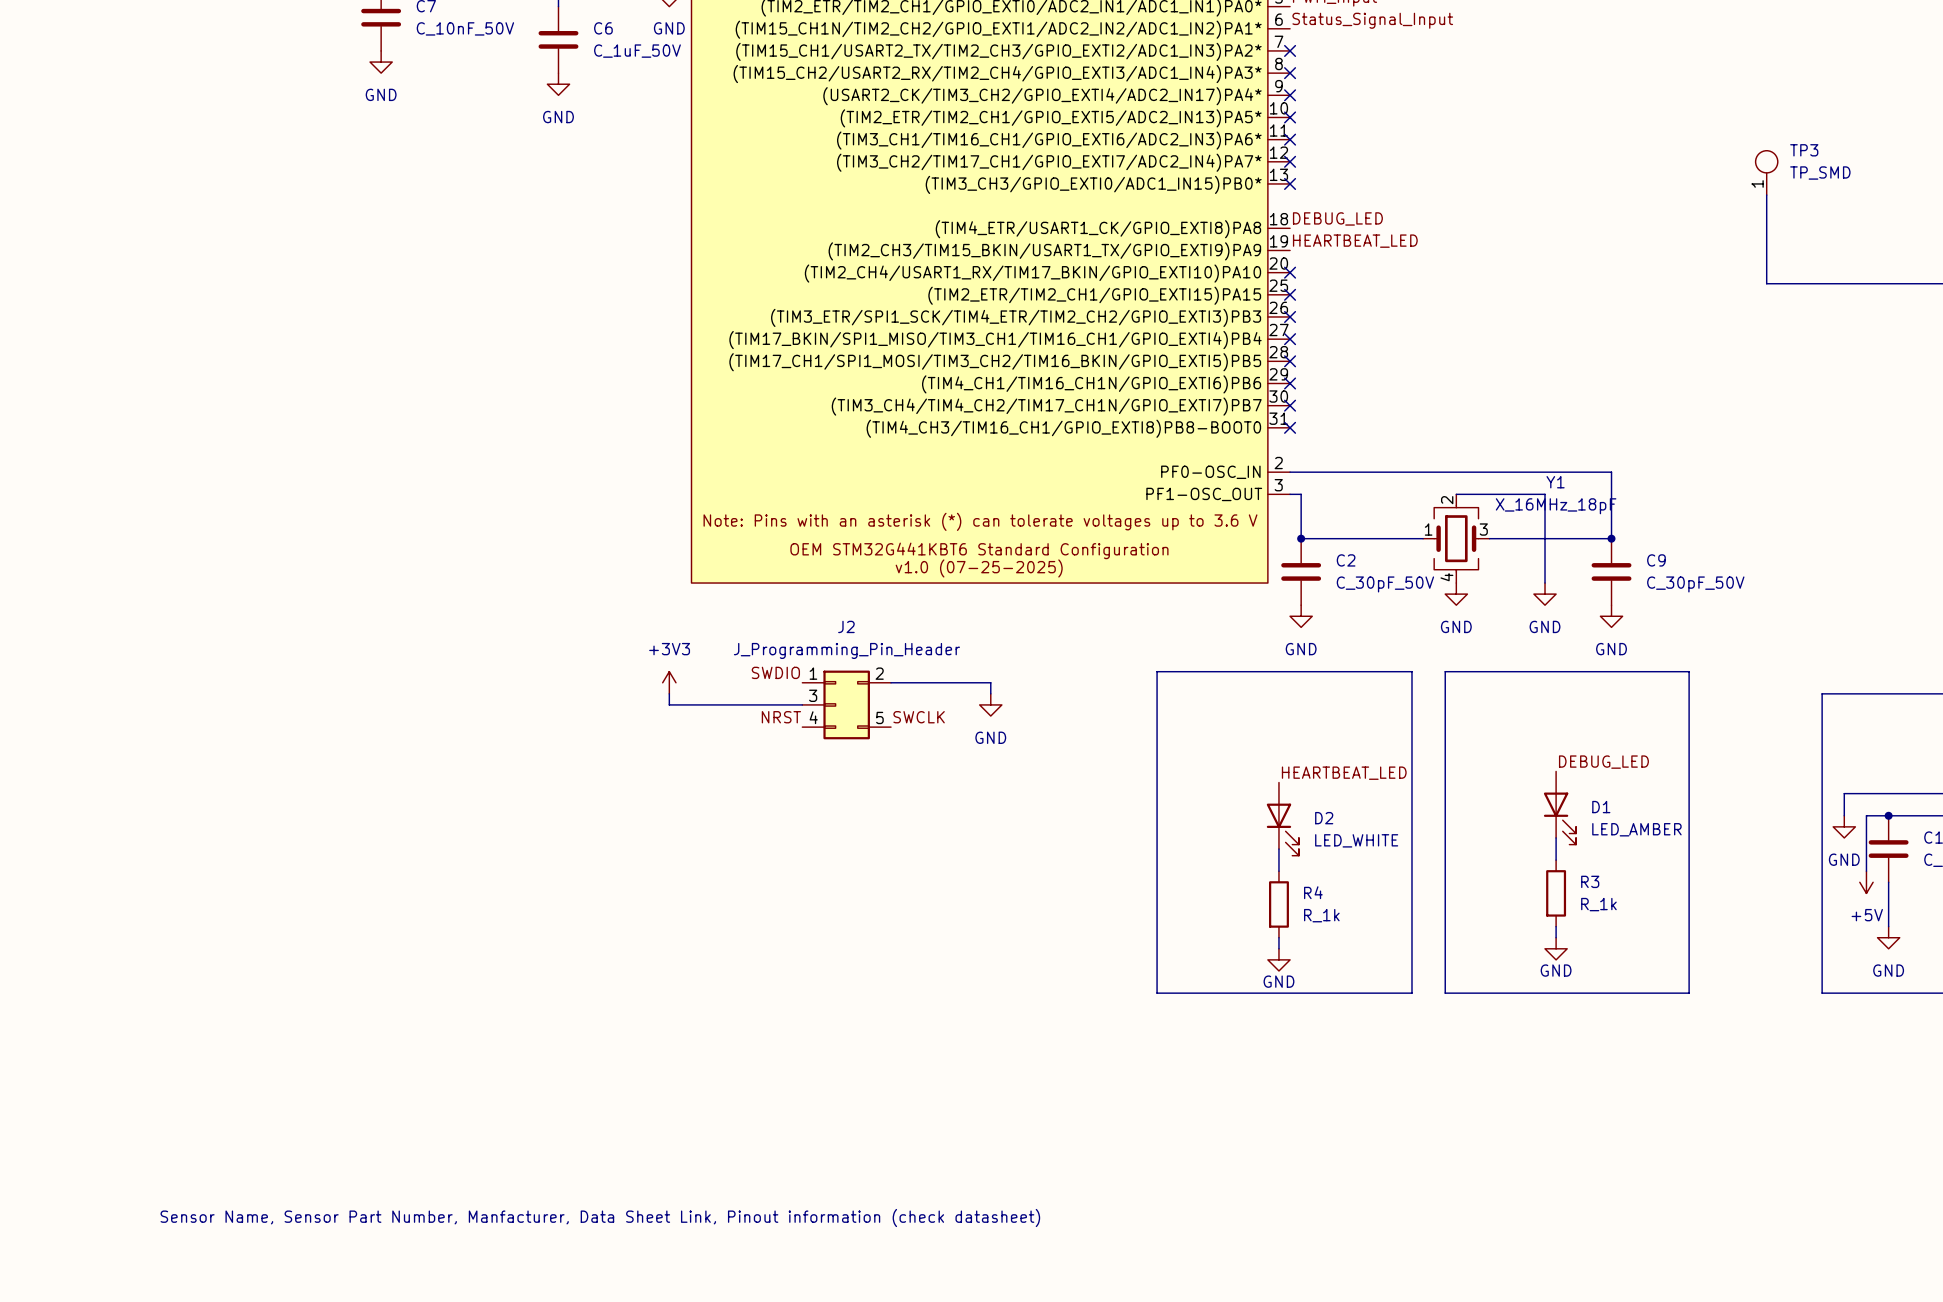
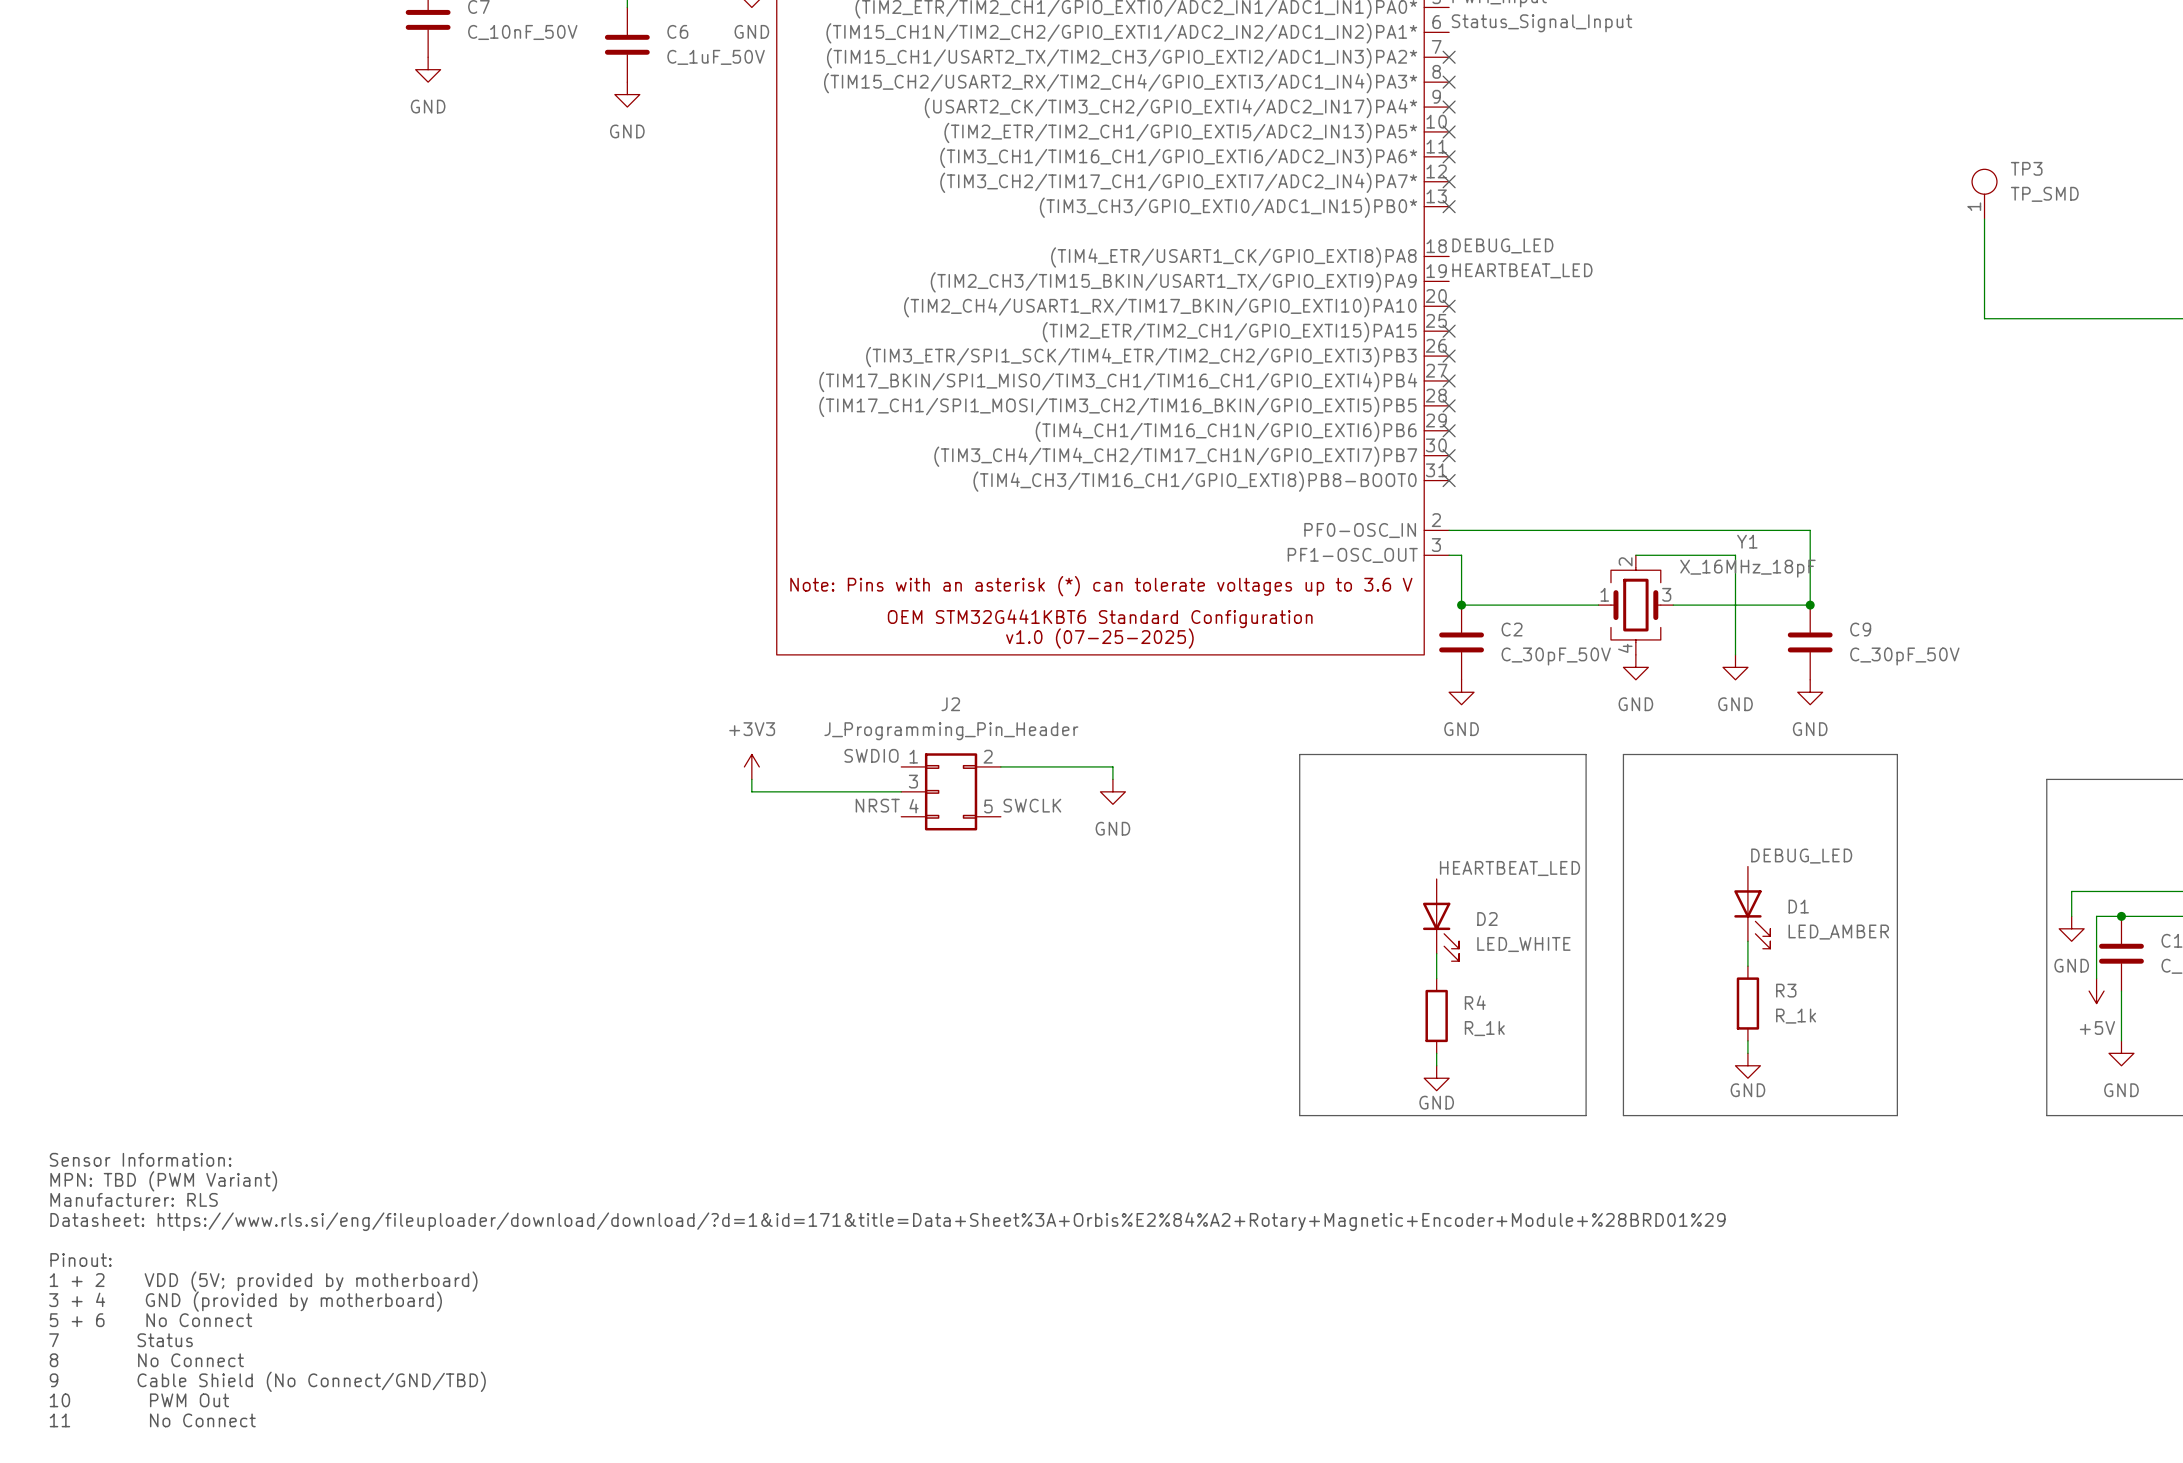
text: none -> Sensor Information: (140, 1159)
text: none -> MPN: TBD (PWM Variant) (163, 1181)
text: none -> Manufacturer: RLS (134, 1199)
text: none -> Datasheet: https://www.rls.si/eng/fileuploader/download/download/?d=1&id=171&title=Data+Sheet%3A+Orbis%E2%84%A2+Rotary+Magnetic+Encoder+Module+%28BRD01%29 (887, 1221)
text: none -> Pinout: (81, 1260)
text: none -> 1 + 2 VDD (5V; provided by motherboard) (263, 1281)
text: none -> 3 + 4 GND (provided by motherboard) (245, 1301)
text: none -> 5 + 6 No Connect (150, 1320)
text: none -> 7 Status (121, 1340)
text: none -> 8 No Connect (146, 1360)
text: Sensor Name, Sensor Part Number, Manfacturer, Data Sheet Link, Pinout information (check datasheet) (600, 1217) -> none
text: none -> 9 Cable Shield (No Connect/GND/TBD) (267, 1381)
text: none -> 10 PWM Out (139, 1400)
text: none -> 11 No Connect (152, 1420)

